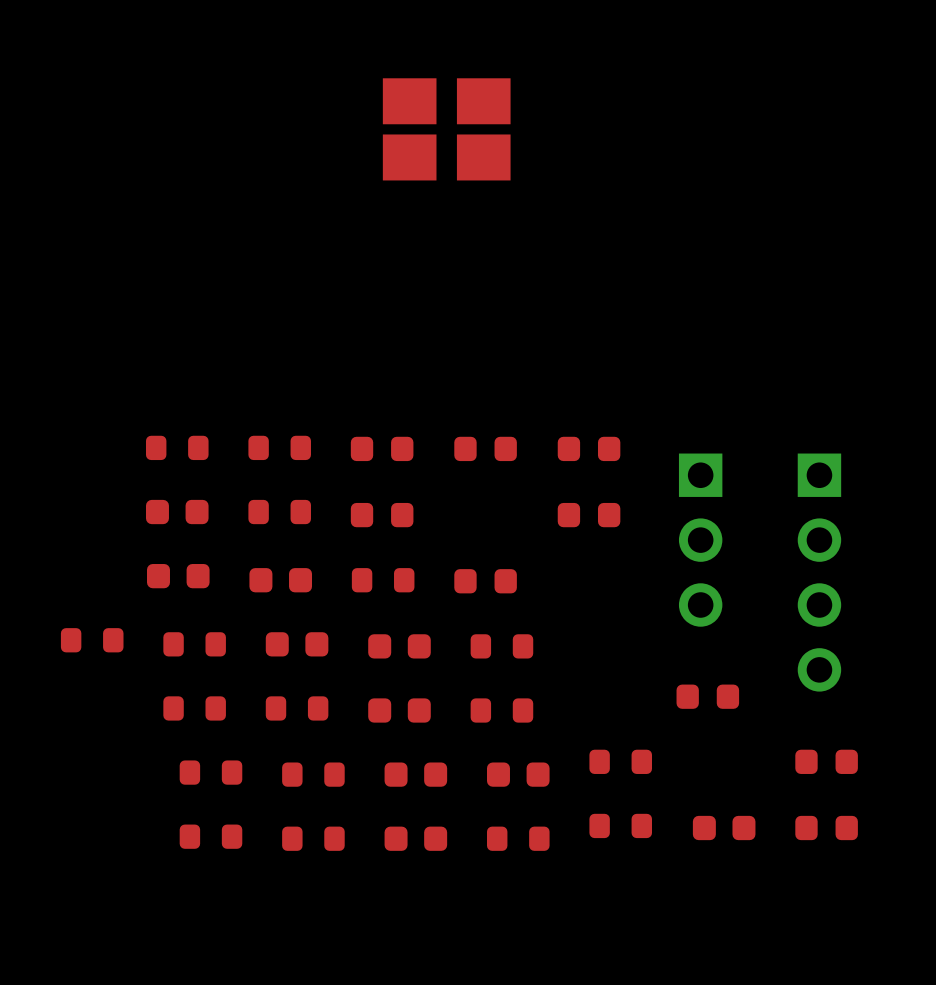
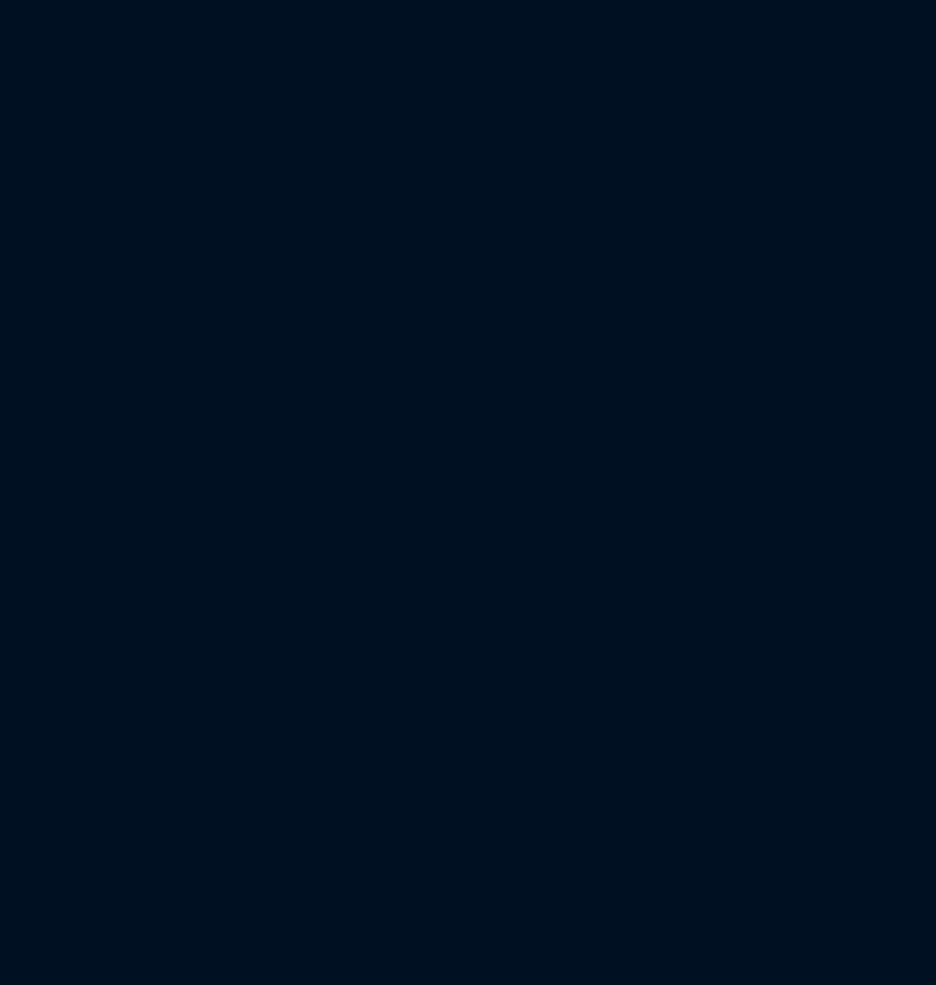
part: (446, 129) -> none
part: (177, 447) -> none
part: (279, 447) -> none
part: (382, 448) -> none
part: (485, 448) -> none
part: (589, 448) -> none
part: (177, 512) -> none
part: (279, 512) -> none
part: (382, 515) -> none
part: (589, 515) -> none
part: (700, 540) -> none
part: (819, 572) -> none
part: (178, 576) -> none
part: (280, 580) -> none
part: (383, 580) -> none
part: (485, 581) -> none
part: (92, 640) -> none
part: (194, 644) -> none
part: (297, 644) -> none
part: (399, 646) -> none
part: (501, 646) -> none
part: (707, 696) -> none
part: (194, 708) -> none
part: (297, 708) -> none
part: (399, 710) -> none
part: (501, 710) -> none
part: (620, 761) -> none
part: (826, 761) -> none
part: (210, 772) -> none
part: (313, 774) -> none
part: (415, 774) -> none
part: (518, 774) -> none
part: (620, 825) -> none
part: (724, 828) -> none
part: (826, 828) -> none
part: (210, 836) -> none
part: (313, 838) -> none
part: (415, 838) -> none
part: (518, 838) -> none

